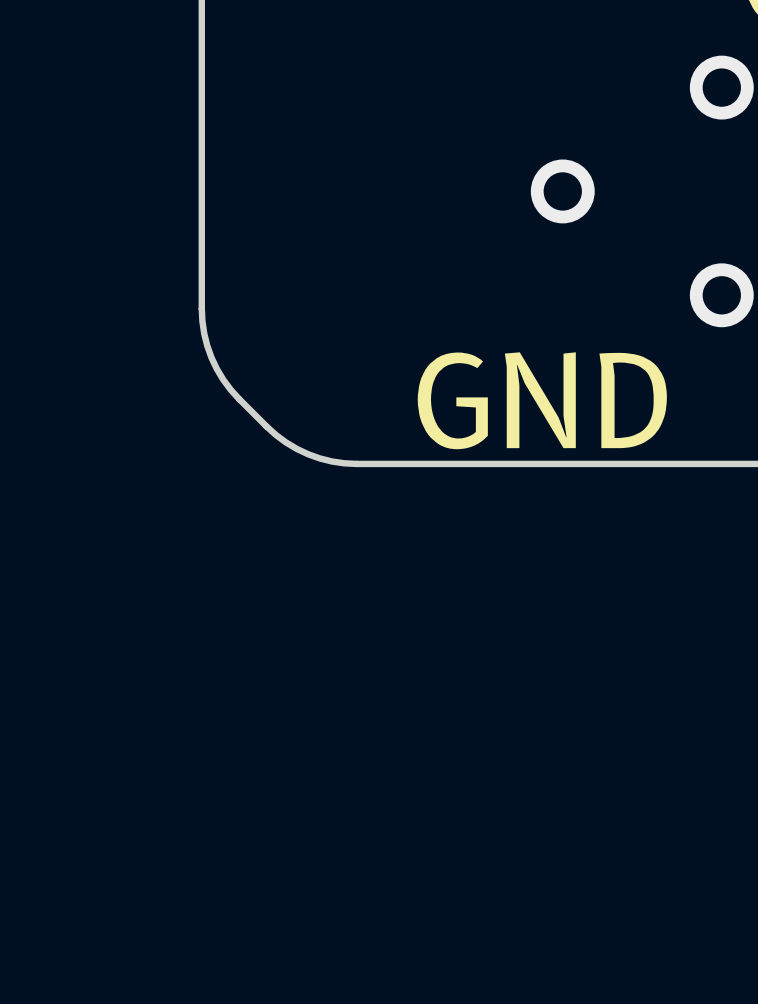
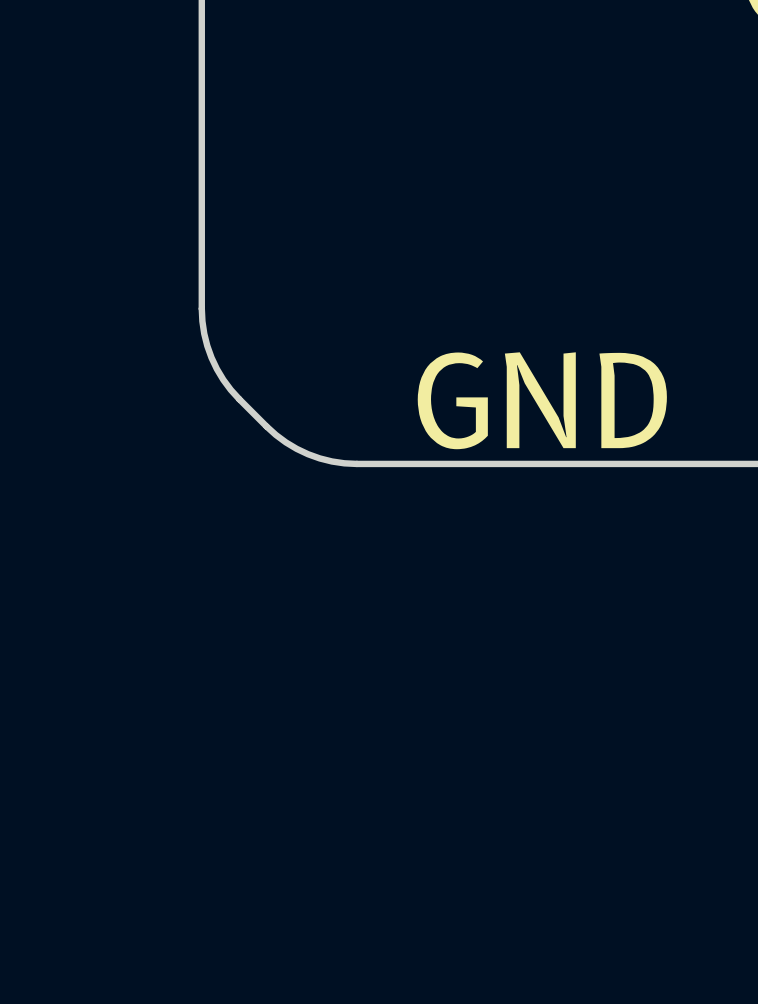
via: (721, 87) -> none
via: (562, 191) -> none
via: (721, 295) -> none

